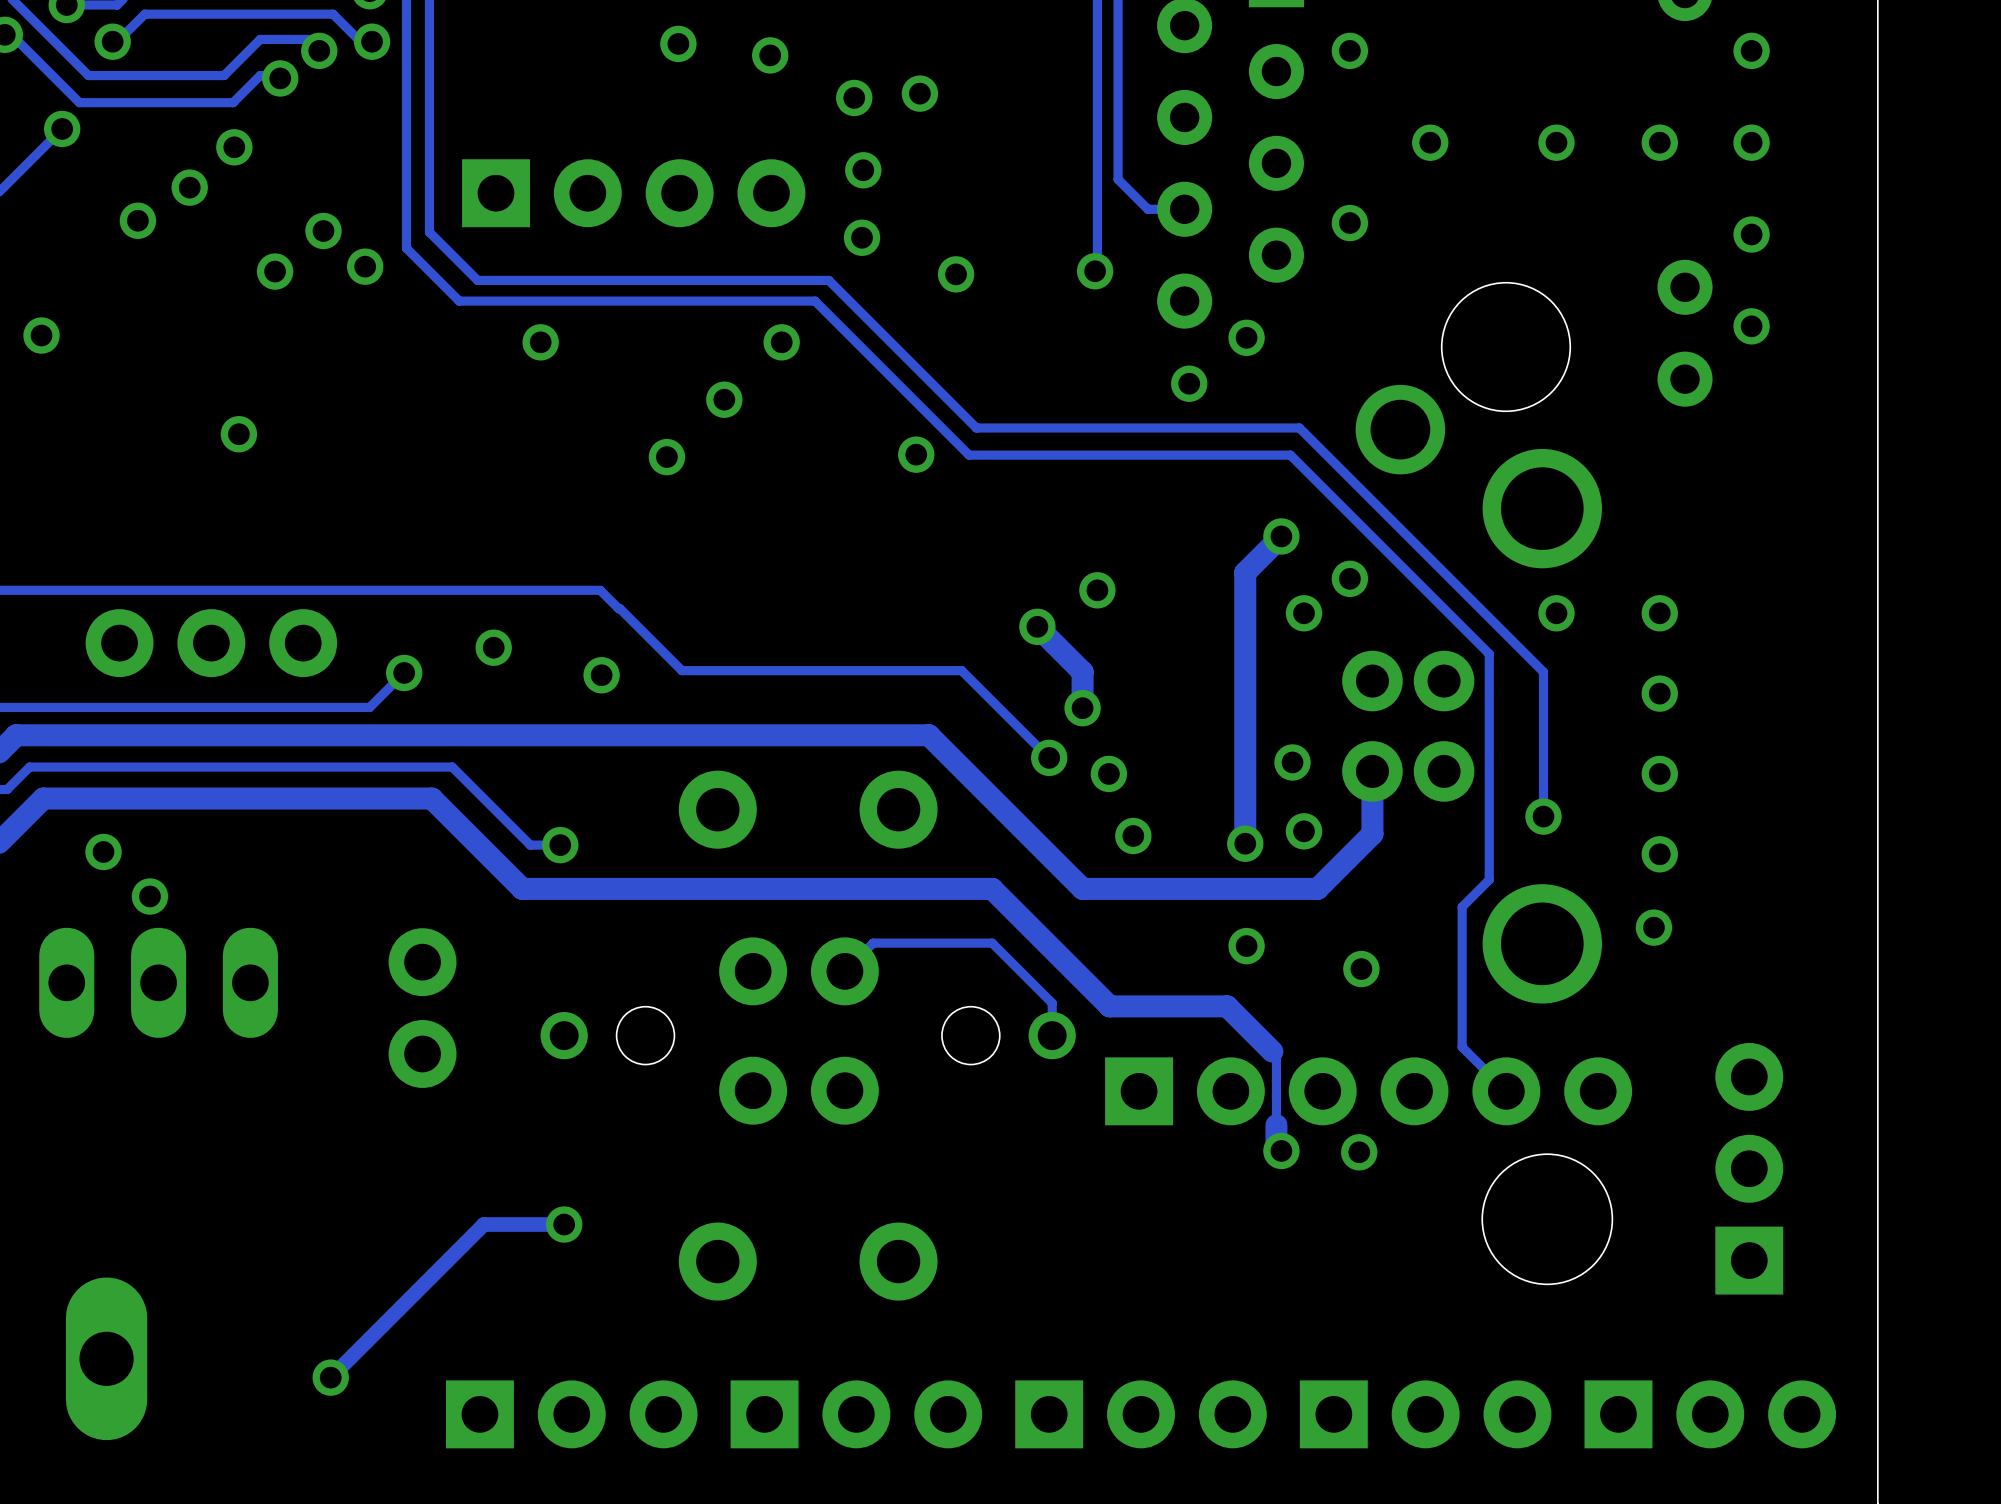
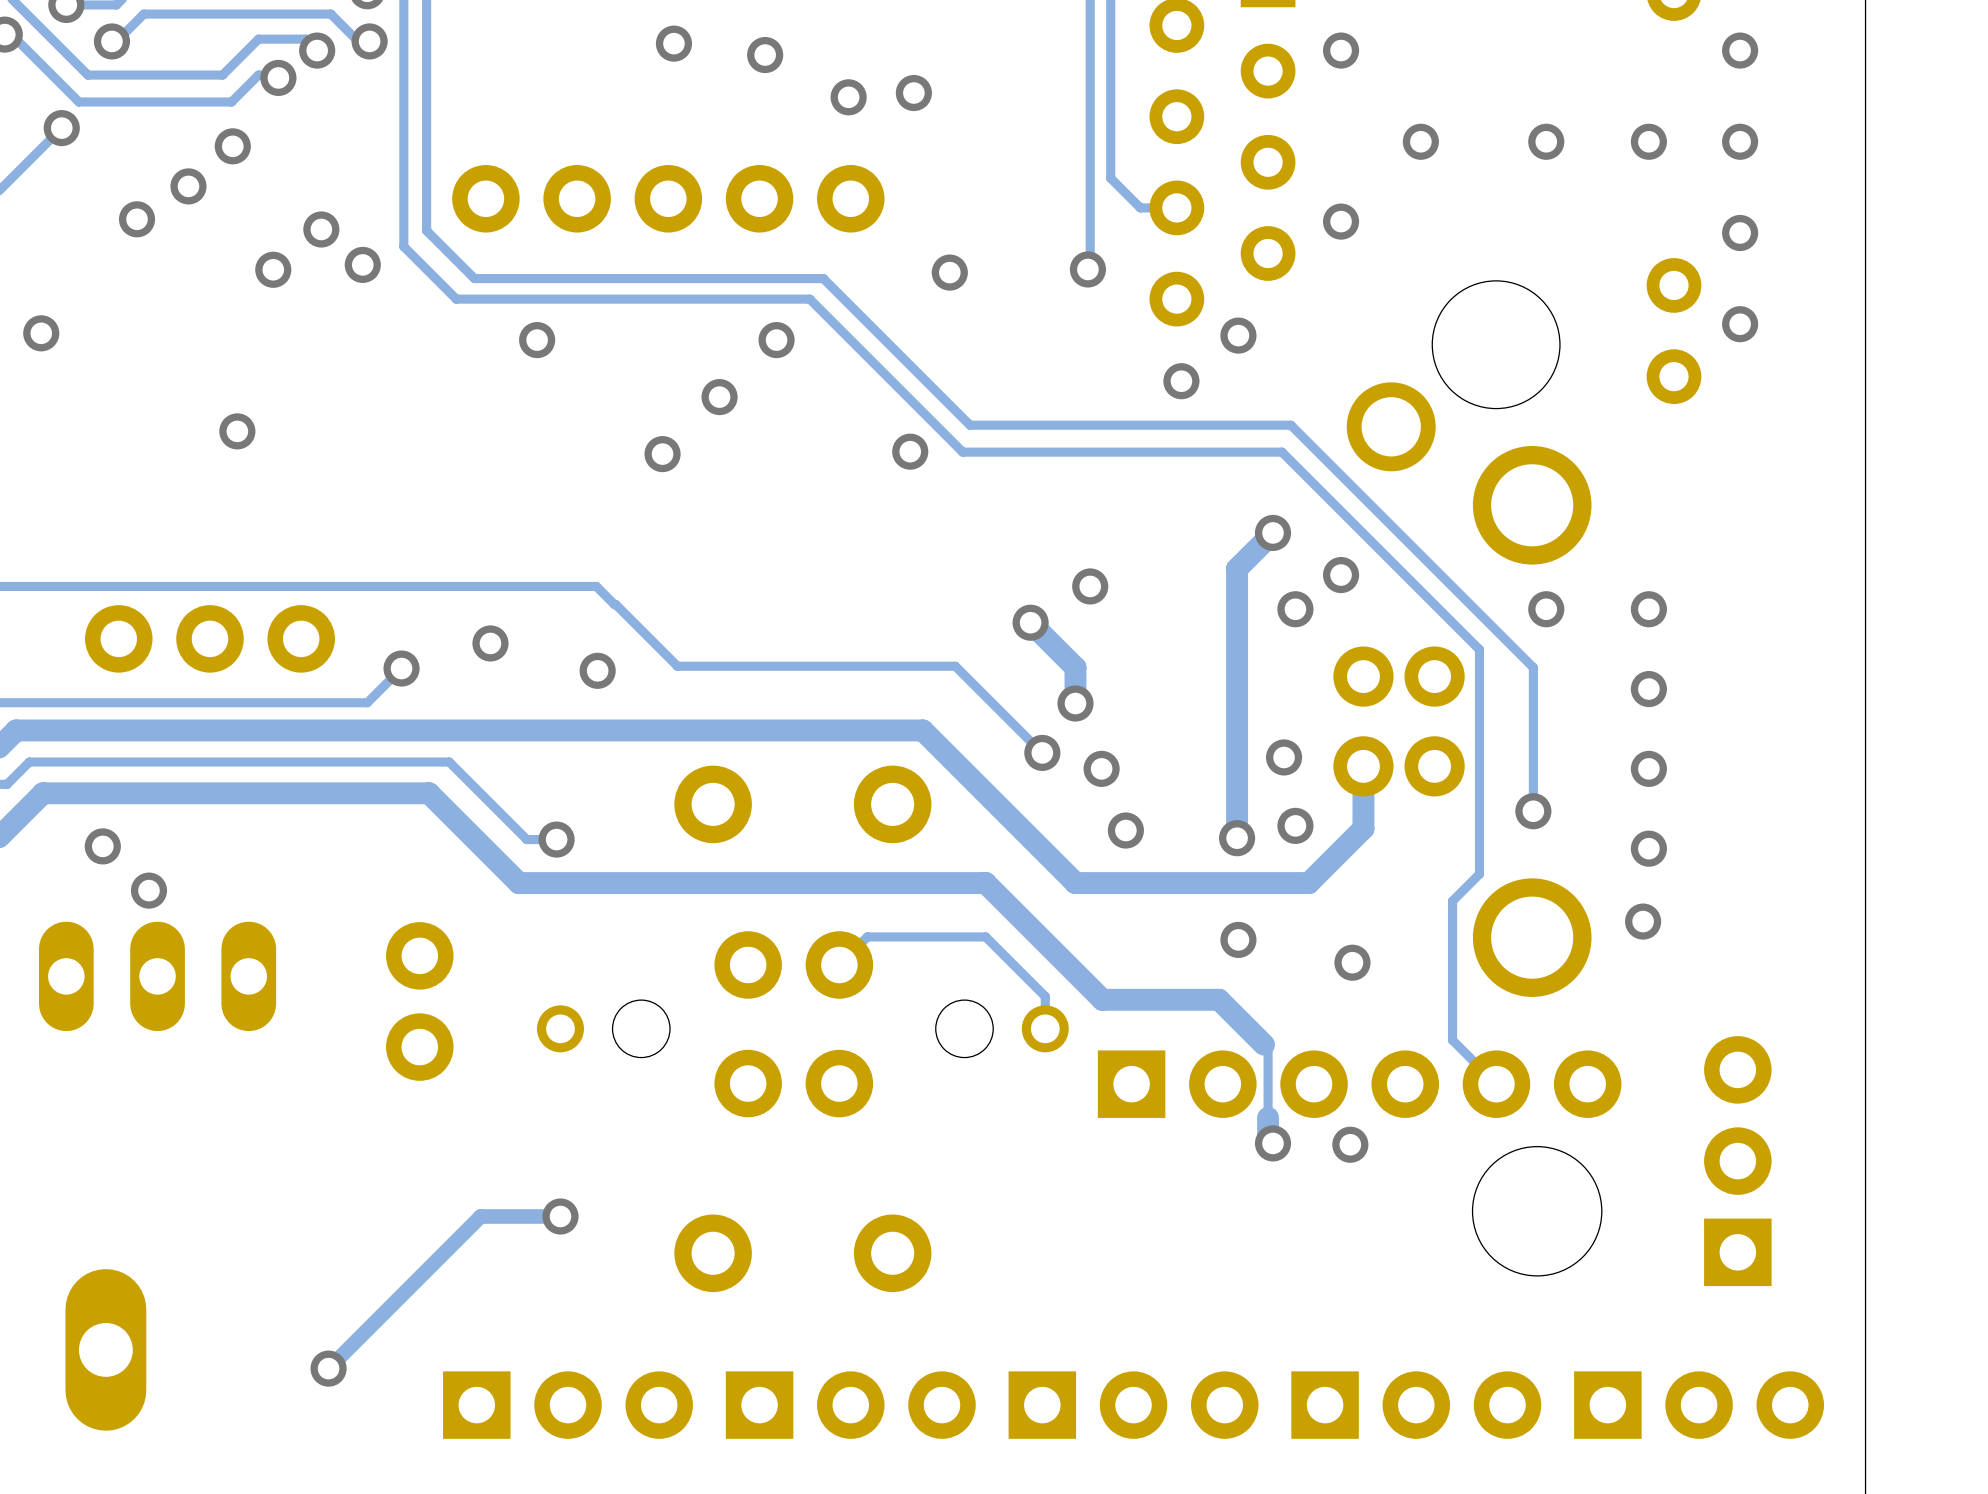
via: (863, 170) -> none
part: (633, 193) -> none
part: none -> (668, 198)
via: (862, 237) -> none

